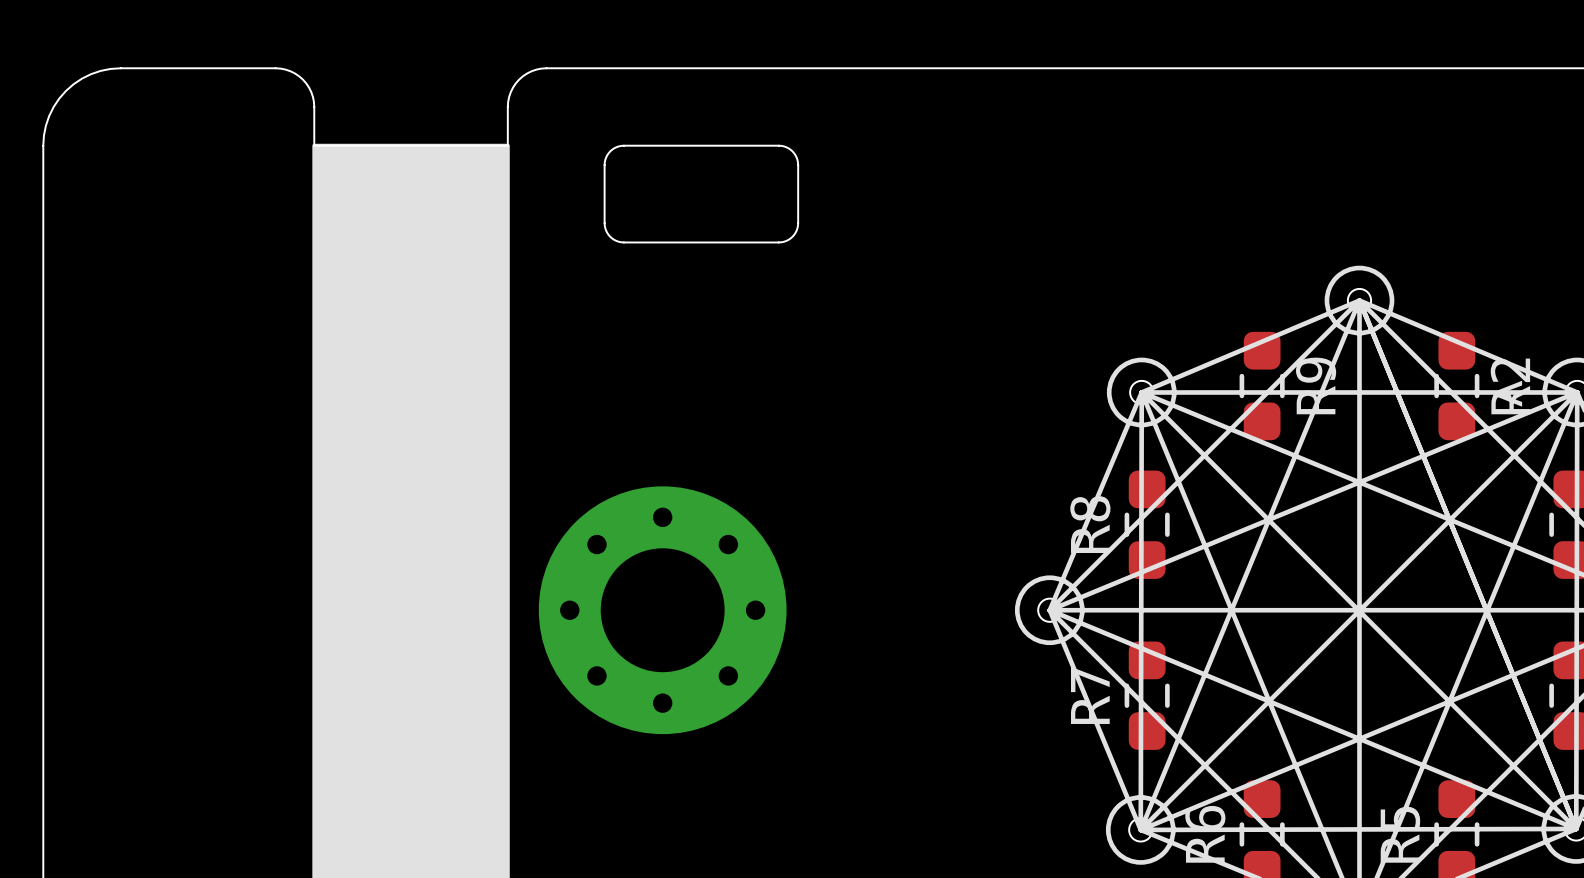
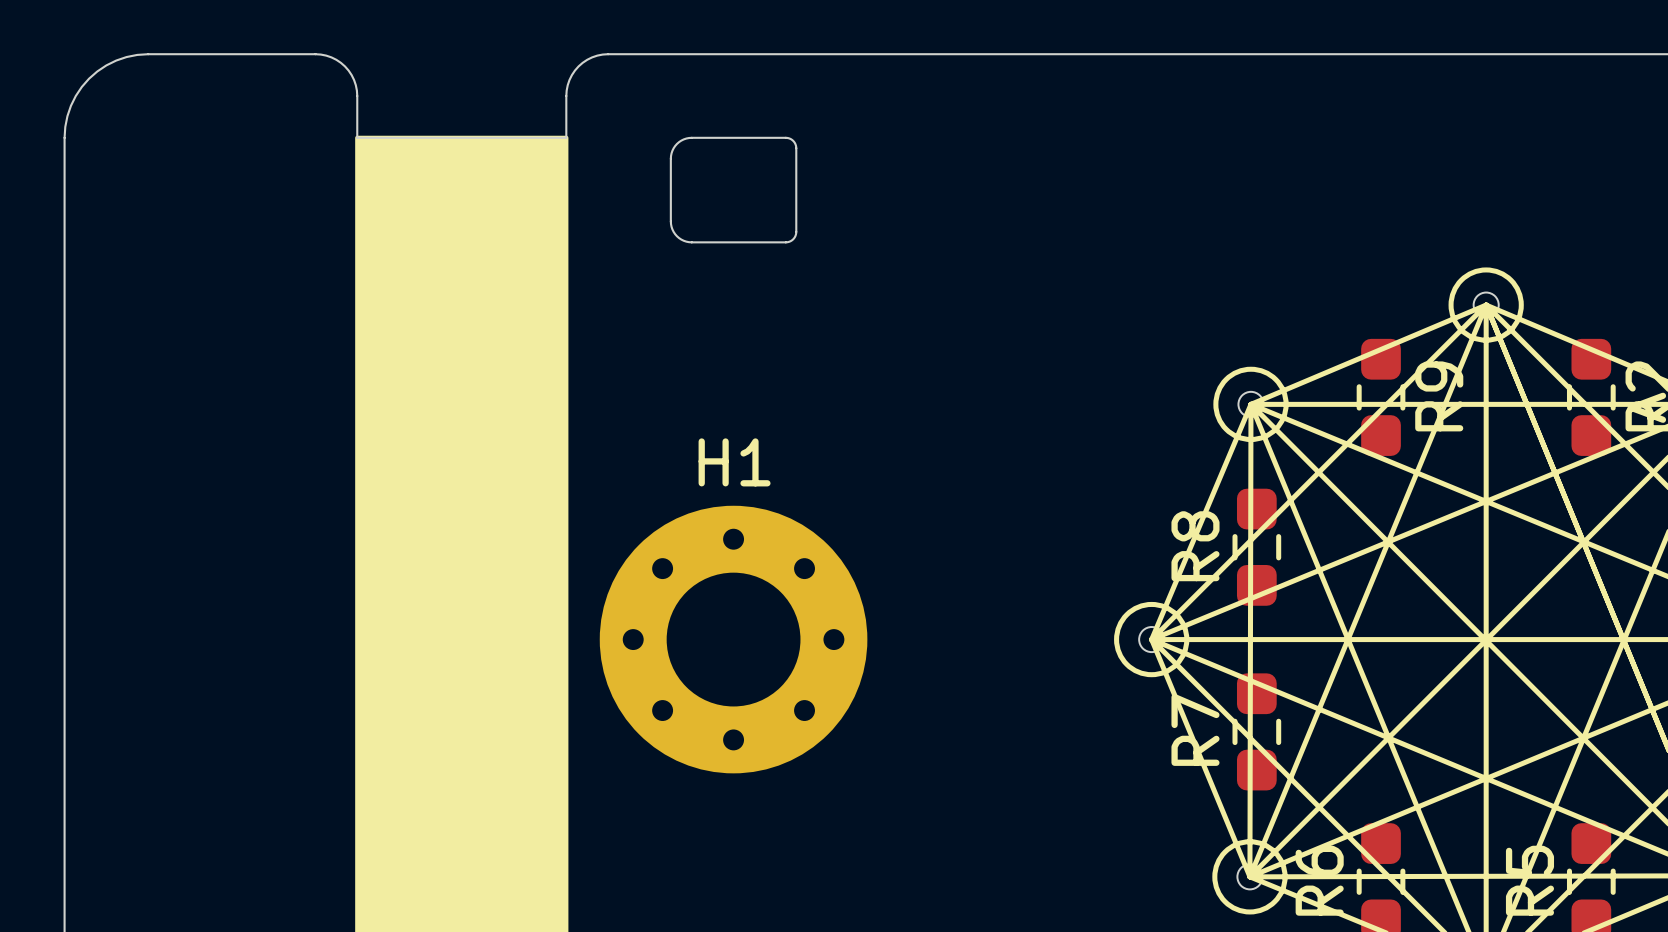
board edge: (711, 145) (783, 146) (794, 153) (798, 165) (798, 225) (792, 236) (781, 242) (711, 242) -> (785, 137) (793, 140) (796, 148) (796, 233) (793, 239) (785, 242)
H1 name: none -> H1 (734, 462)

